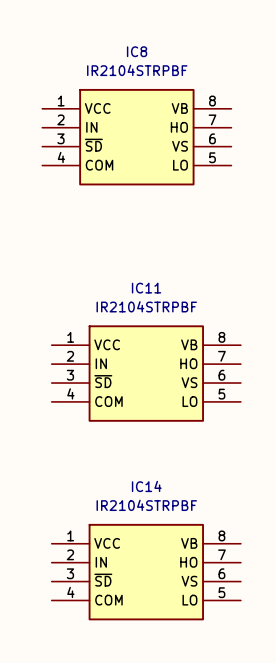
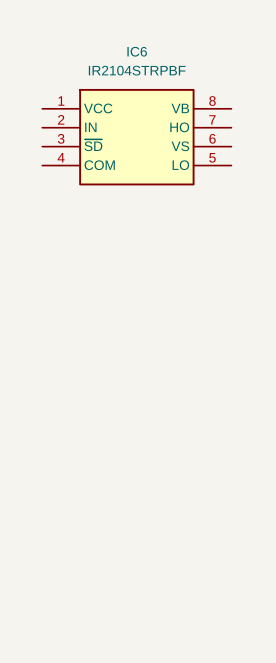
IC8 name: IC8 (137, 51) -> IC6 (137, 51)
IC11: IR2104STRPBF (146, 373) -> none
IC14: IR2104STRPBF (146, 572) -> none

